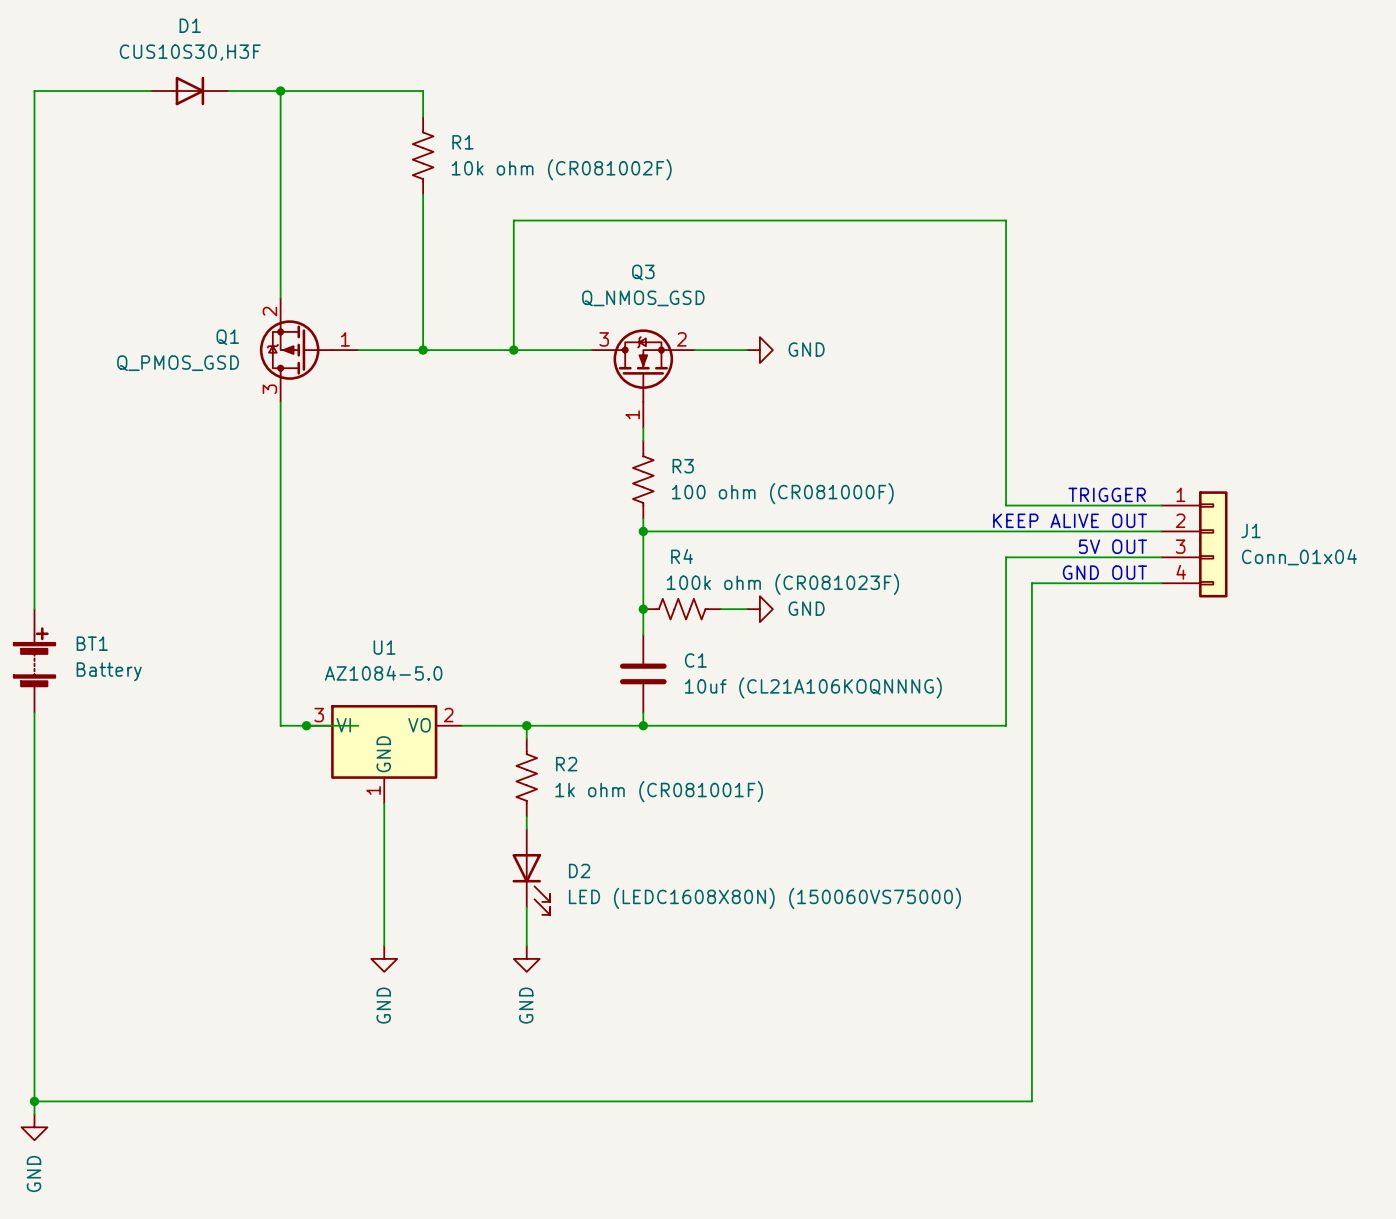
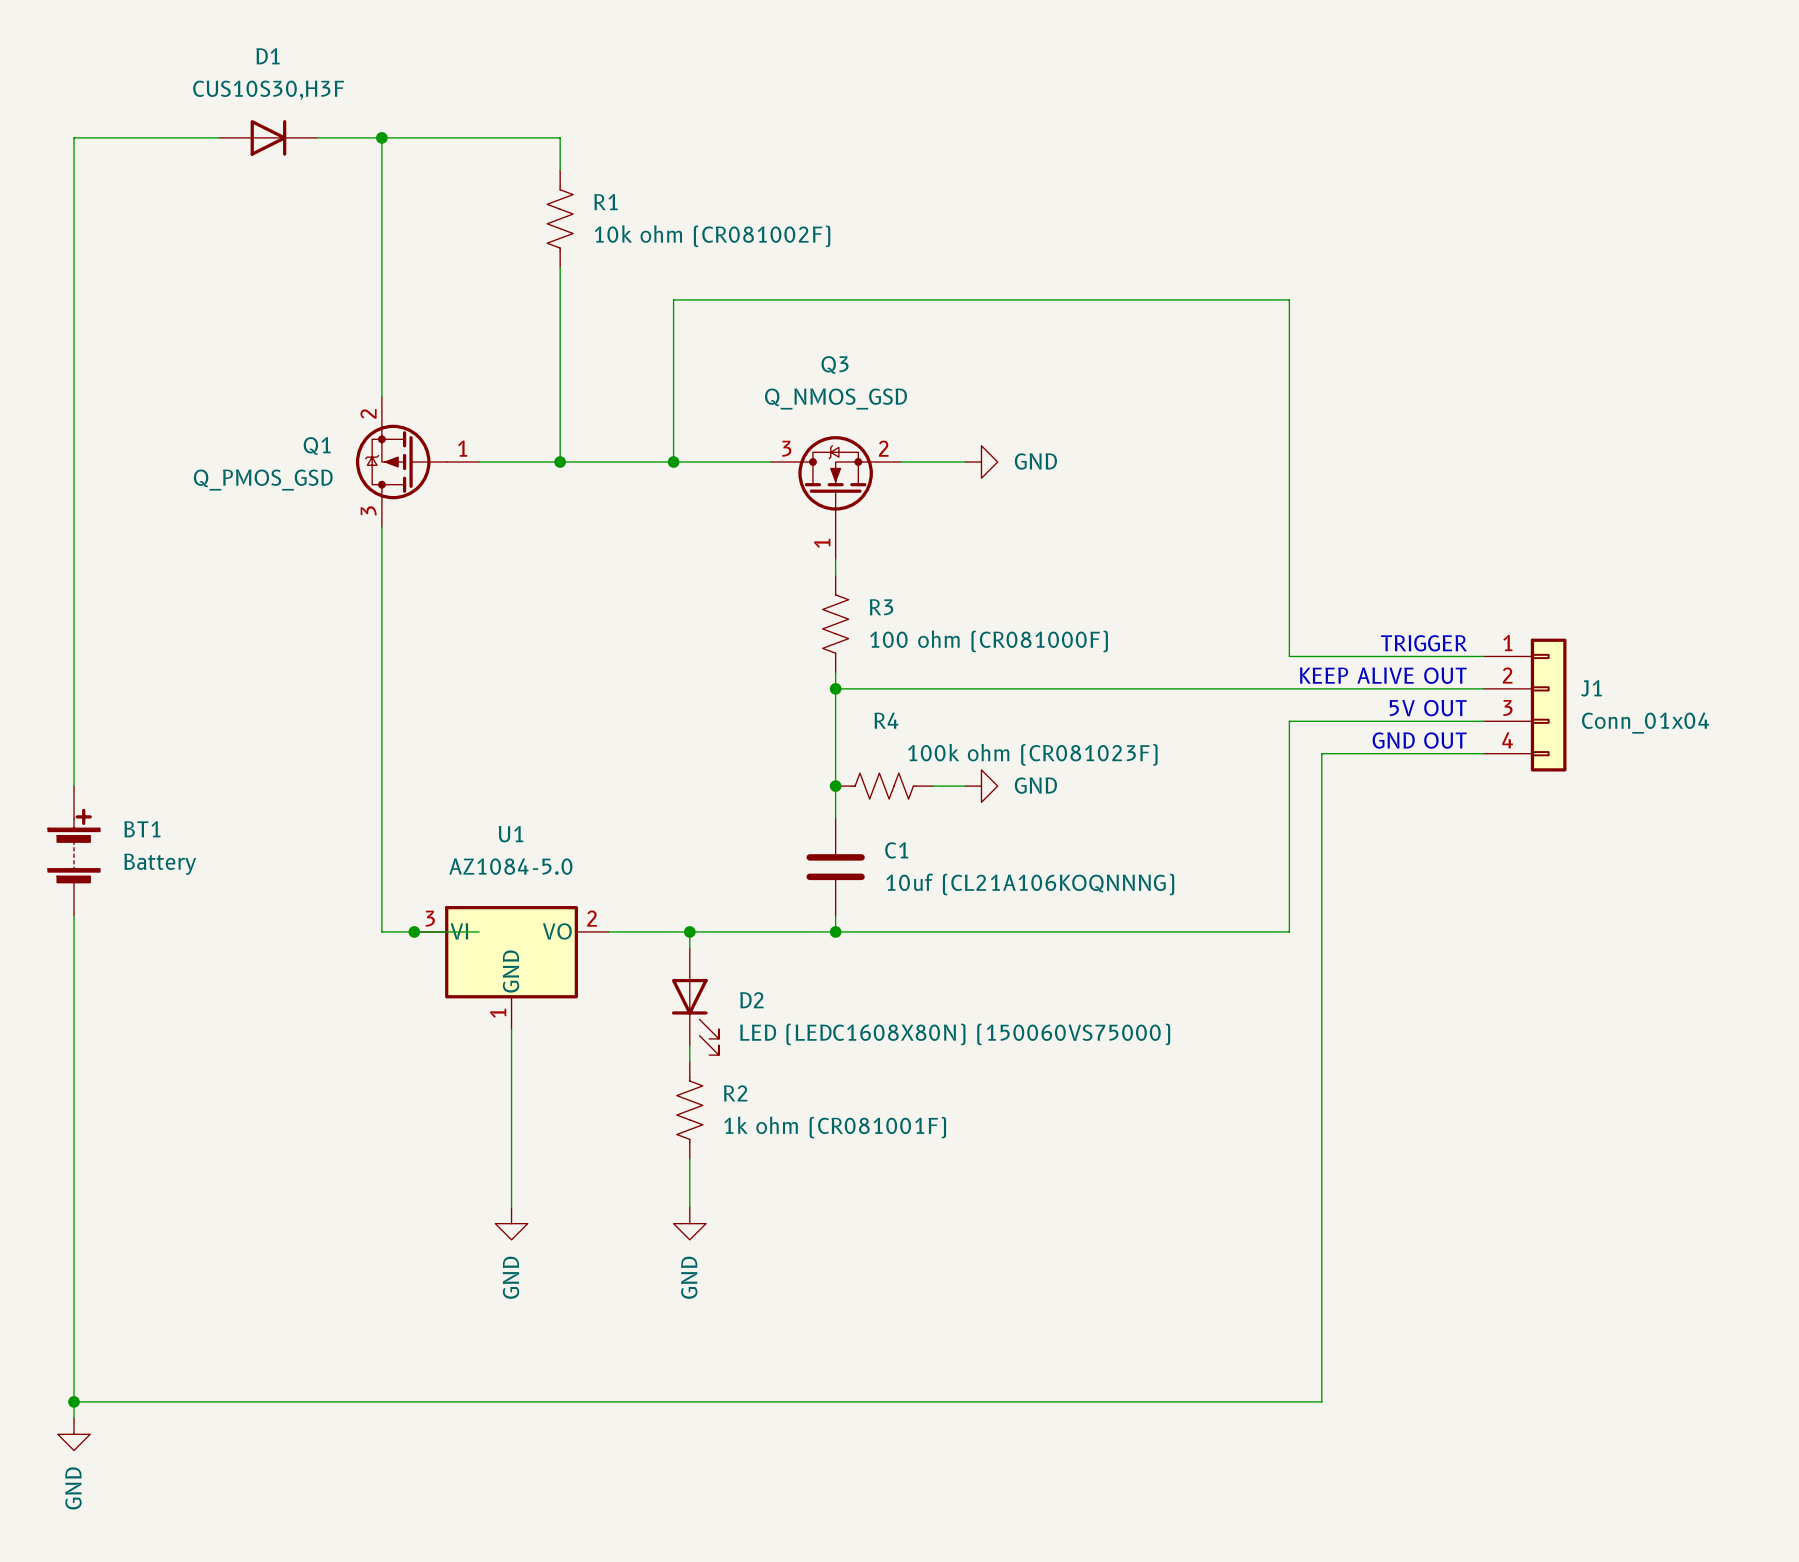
R2 position: (526, 777) -> (689, 1110)
D2 position: (531, 872) -> (695, 1001)

